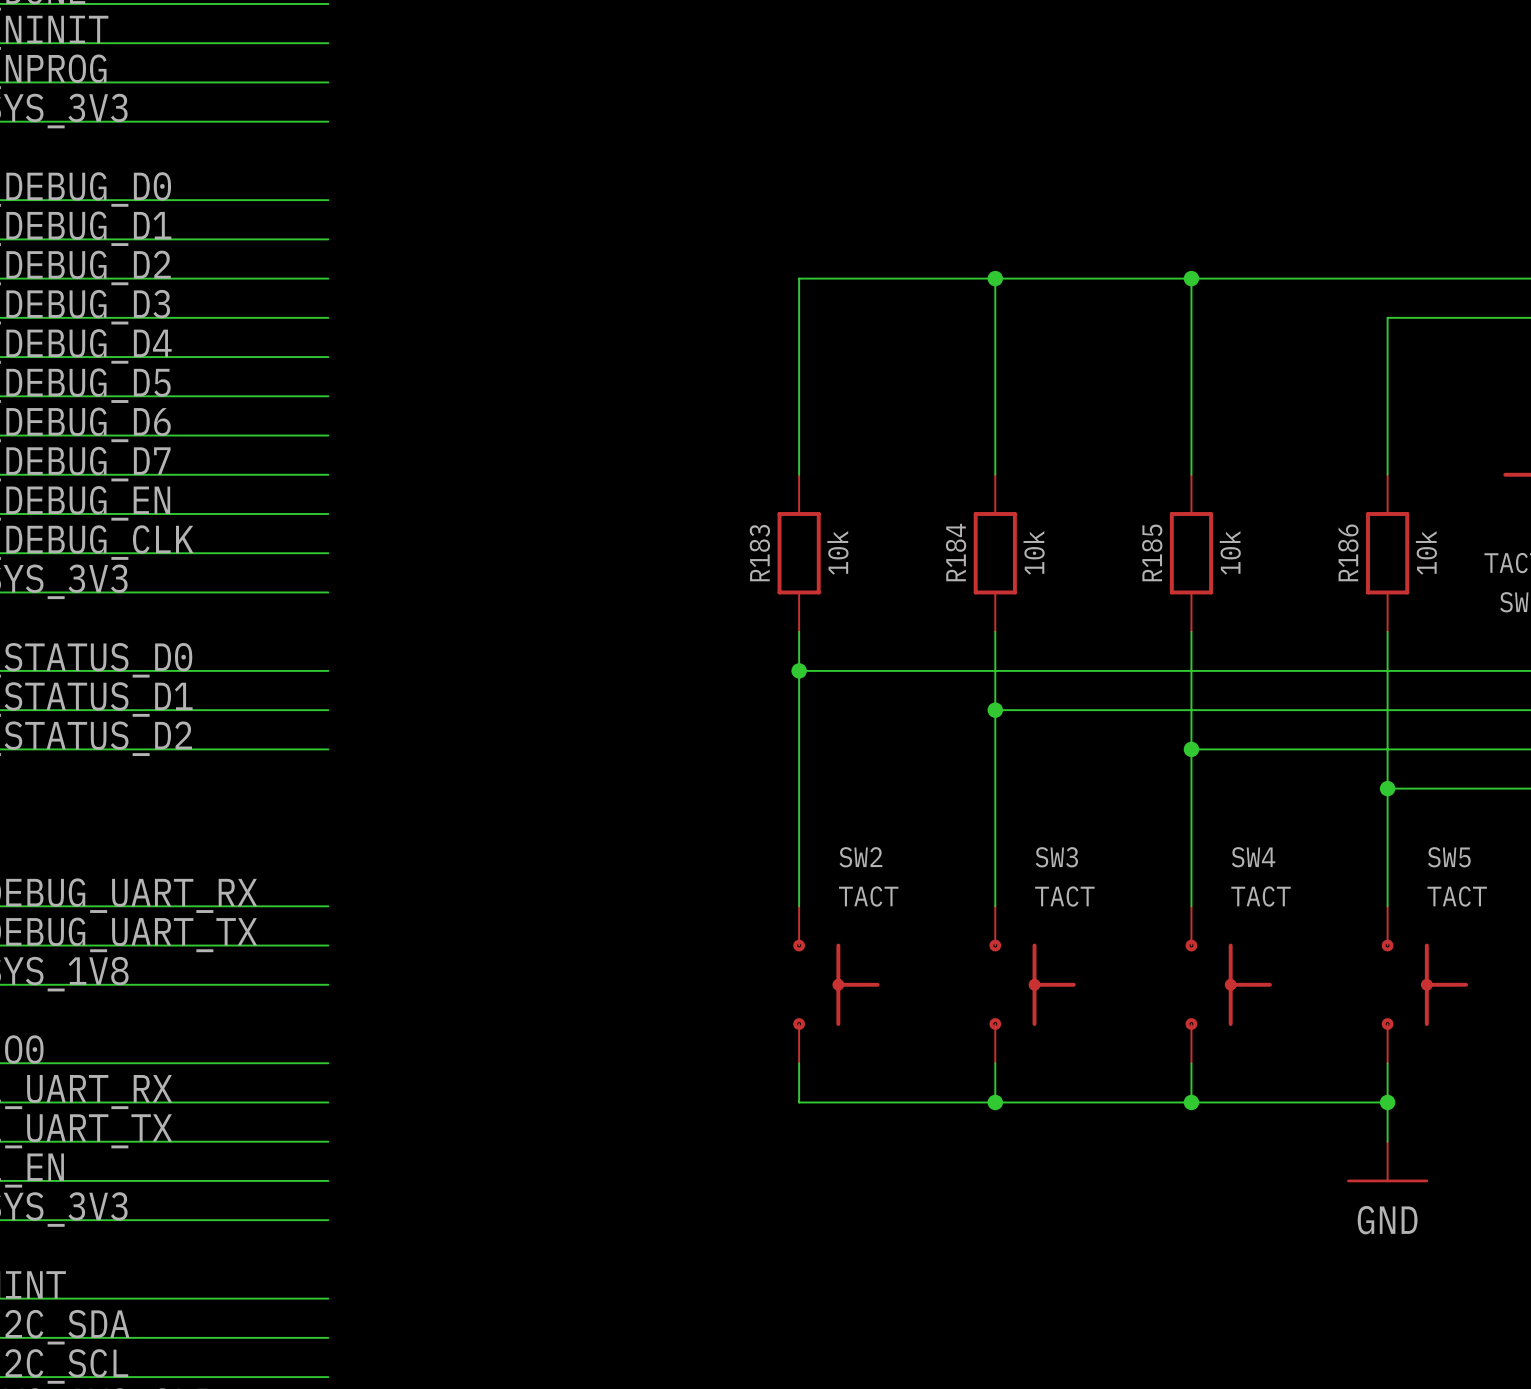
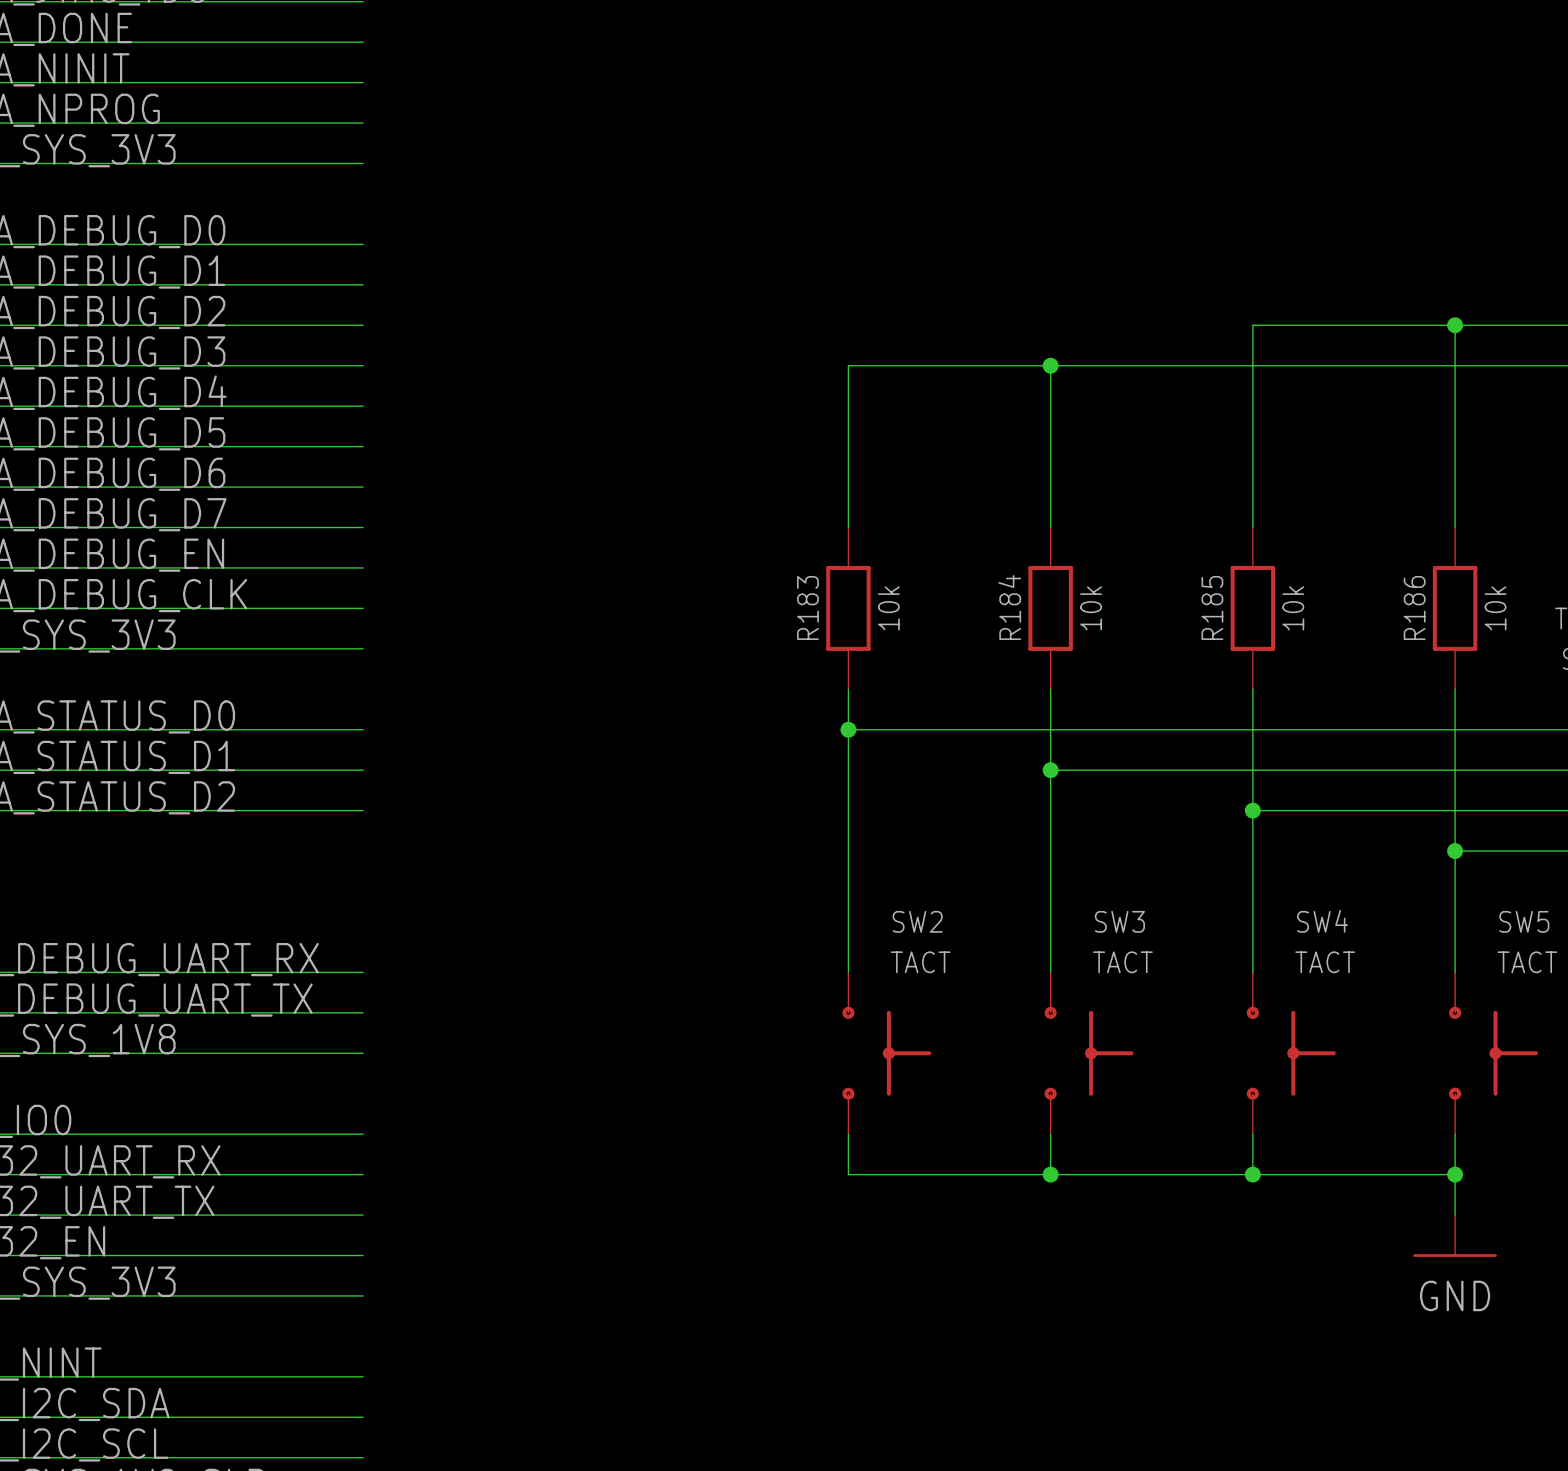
wire: (995, 278) (995, 317) -> none
junction position: (995, 278) -> (1050, 365)
wire: (1191, 278) (799, 278) (799, 317) -> (1455, 325) (1455, 365) (848, 365)
junction: (1191, 278) -> none
junction: none -> (1455, 325)

